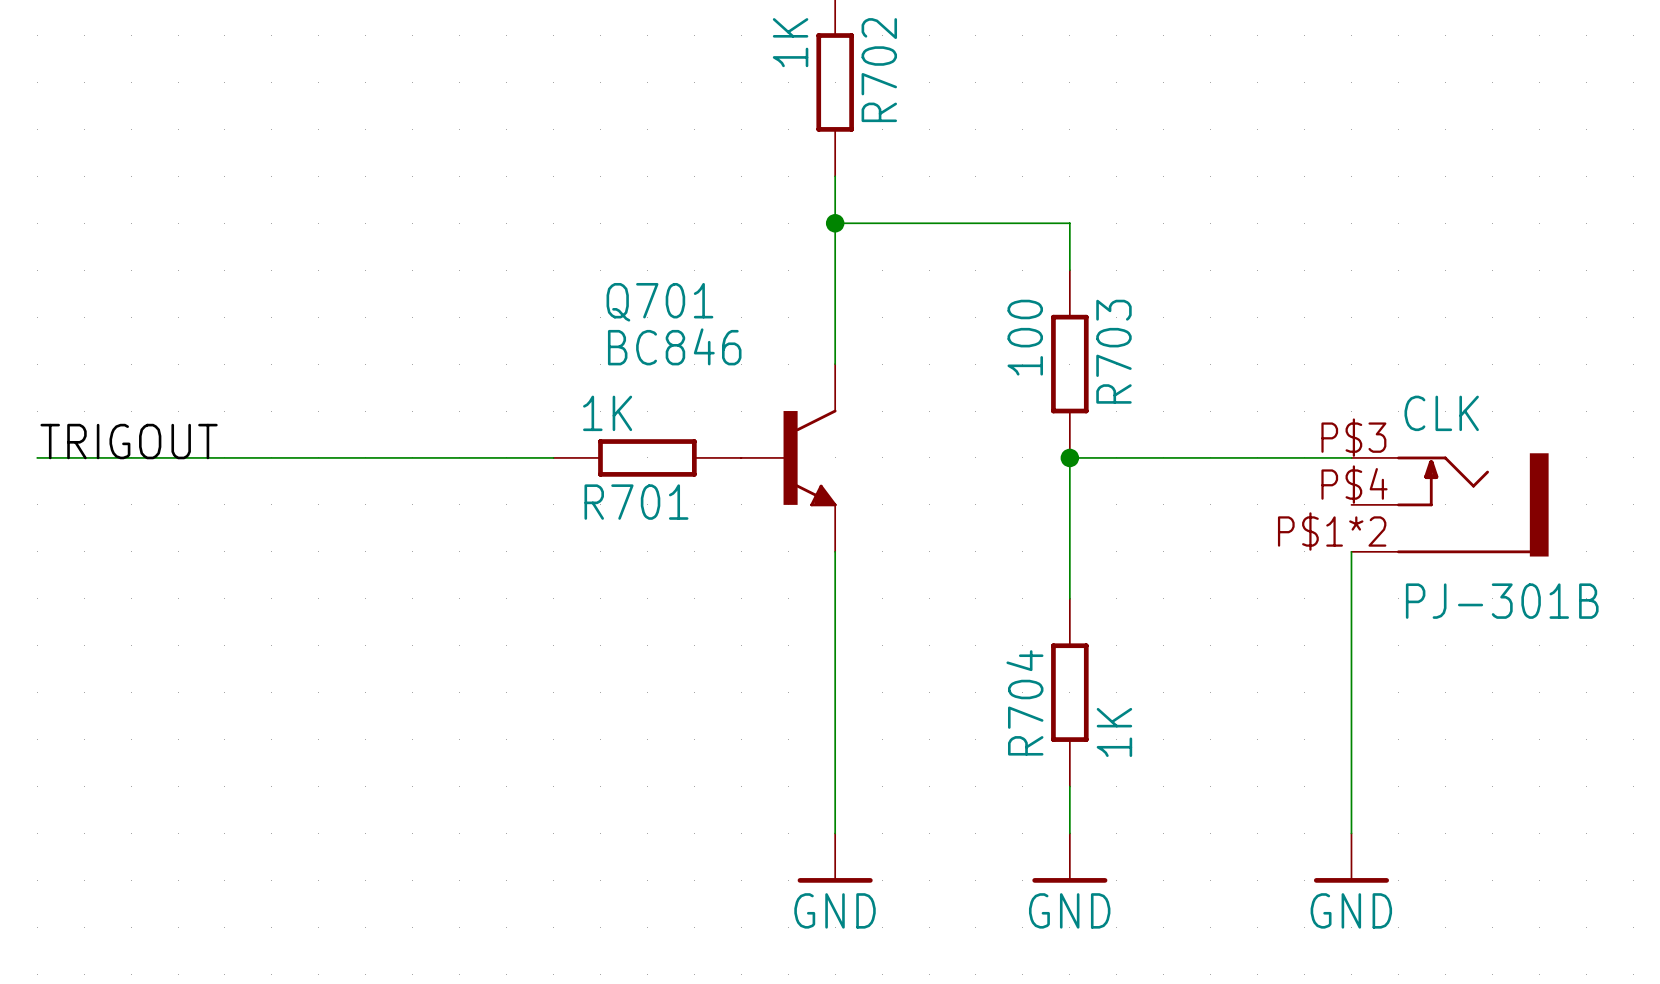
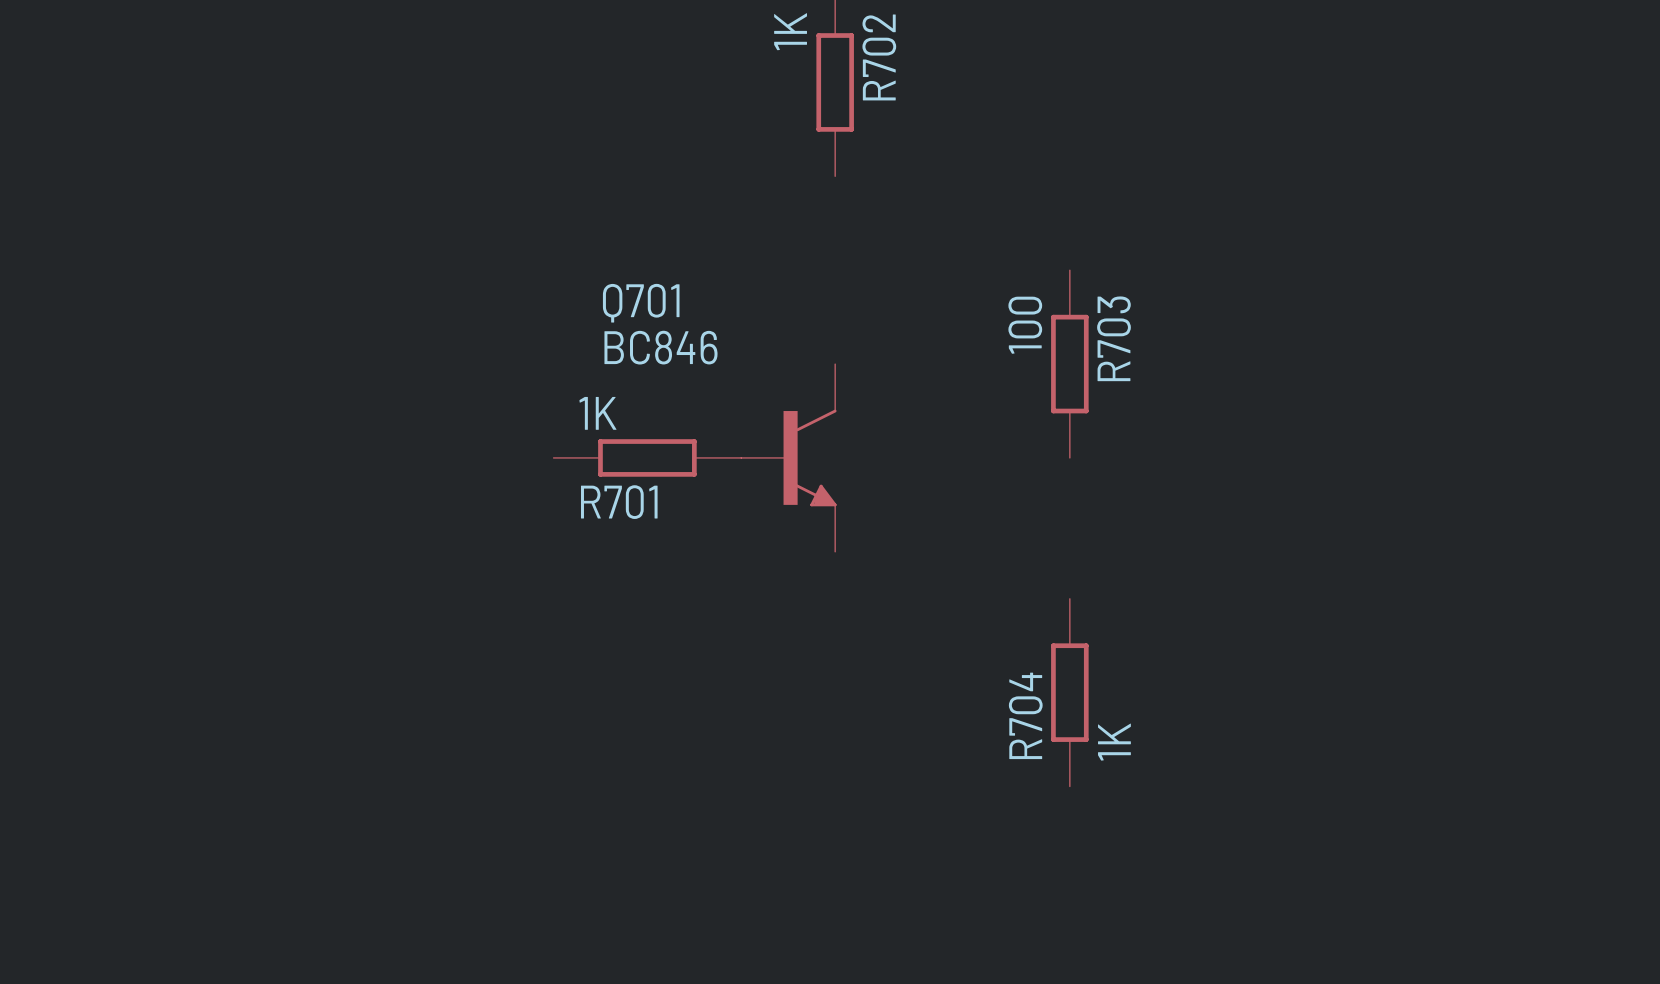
wire: (835, 176) (835, 364) -> none
wire: (835, 223) (1069, 223) (1069, 270) -> none
junction: (835, 223) -> none
label: TRIGOUT (129, 441) -> none
wire: (37, 457) (553, 457) -> none
junction: (1069, 457) -> none
wire: (1351, 457) (1069, 457) (1069, 598) -> none
CLK: PJ-301B (1450, 504) -> none
wire: (835, 551) (835, 833) -> none
wire: (1351, 551) (1351, 833) -> none
wire: (1069, 786) (1069, 833) -> none
power symbol: GND (835, 858) -> none
power symbol: GND (1069, 858) -> none
power symbol: GND (1351, 858) -> none

